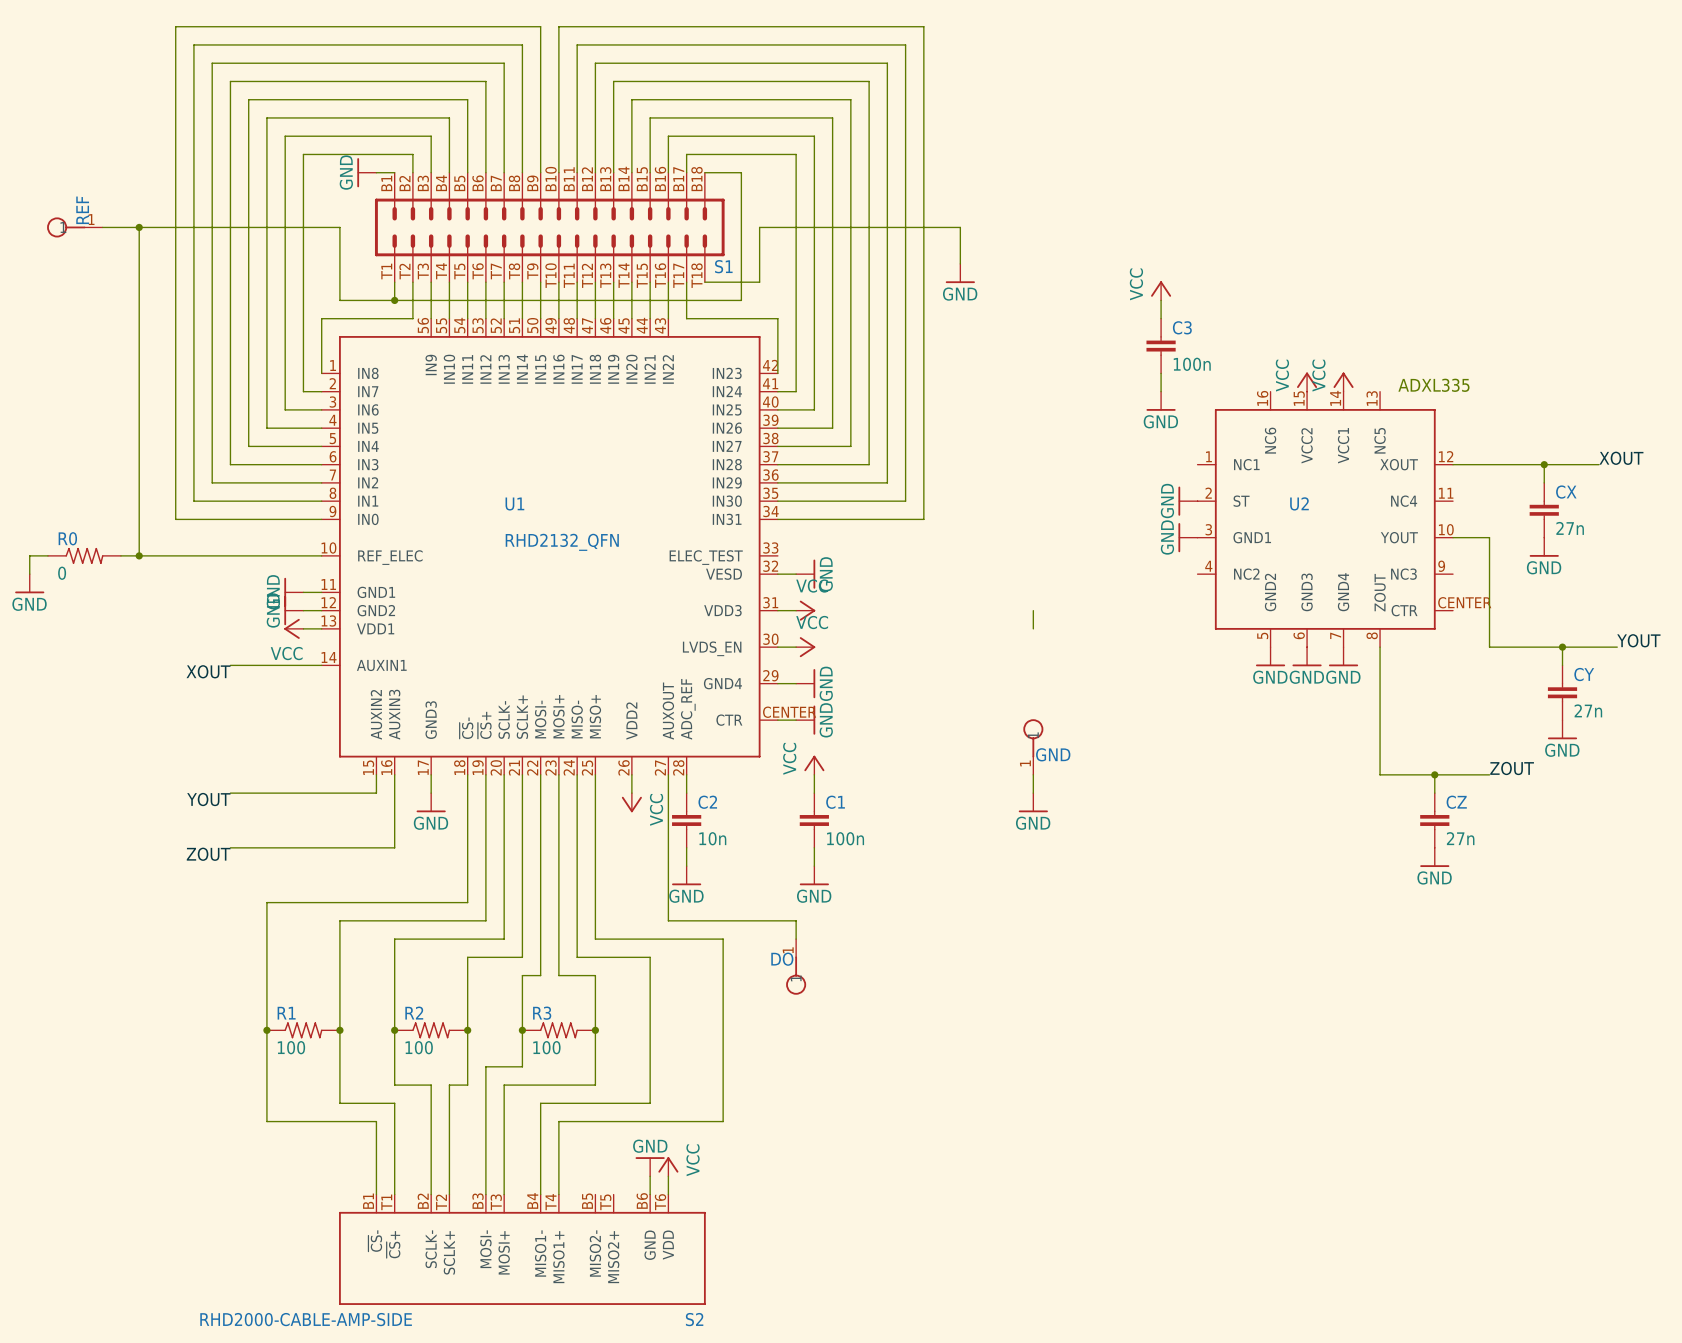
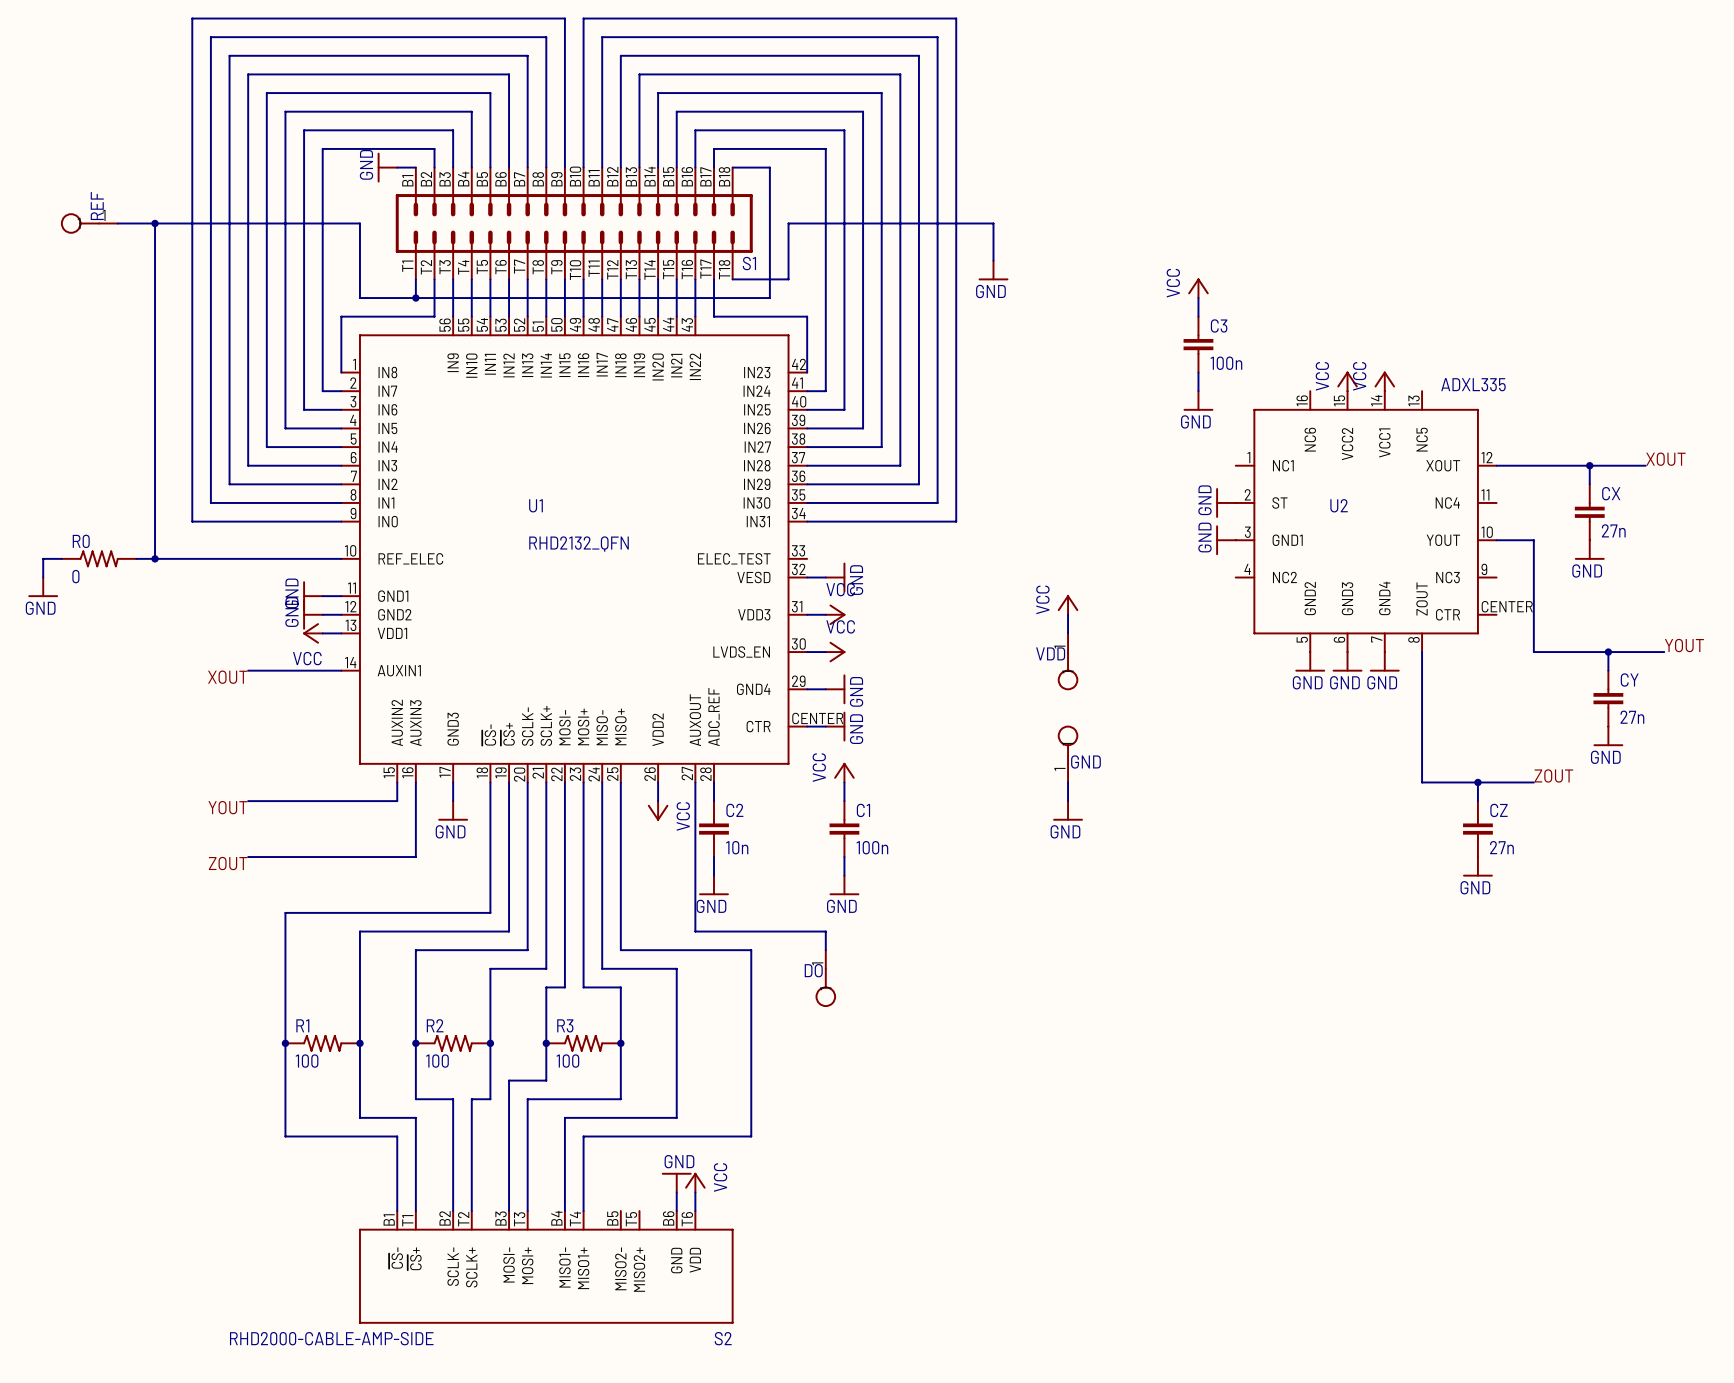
power symbol: none -> VCC (1068, 604)
VDD: none -> (1068, 661)

